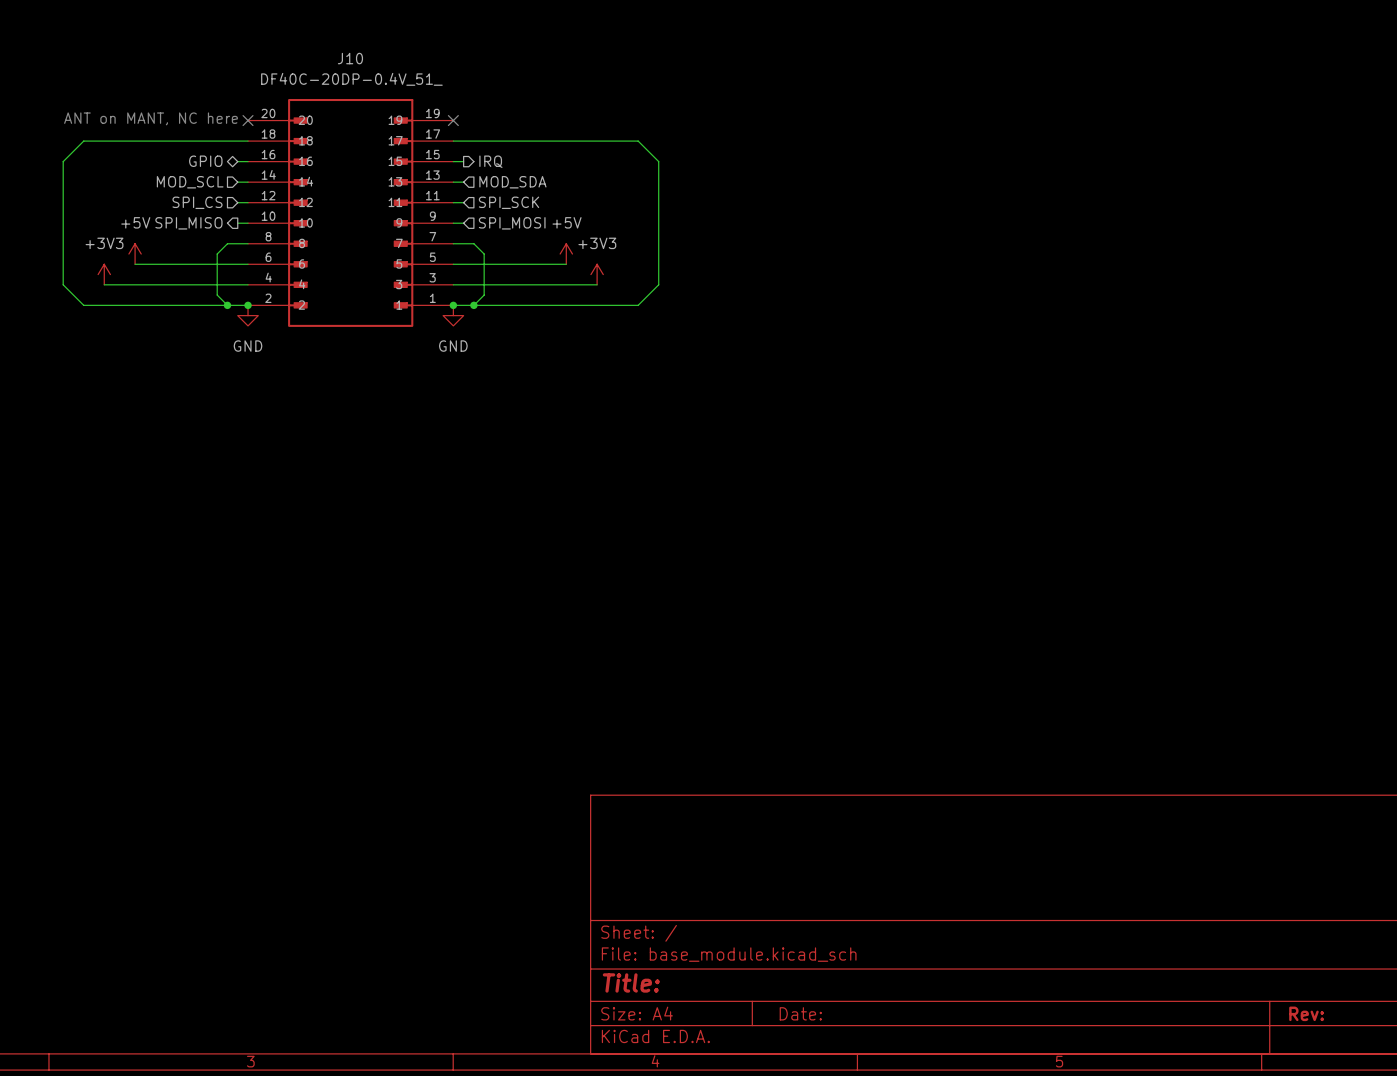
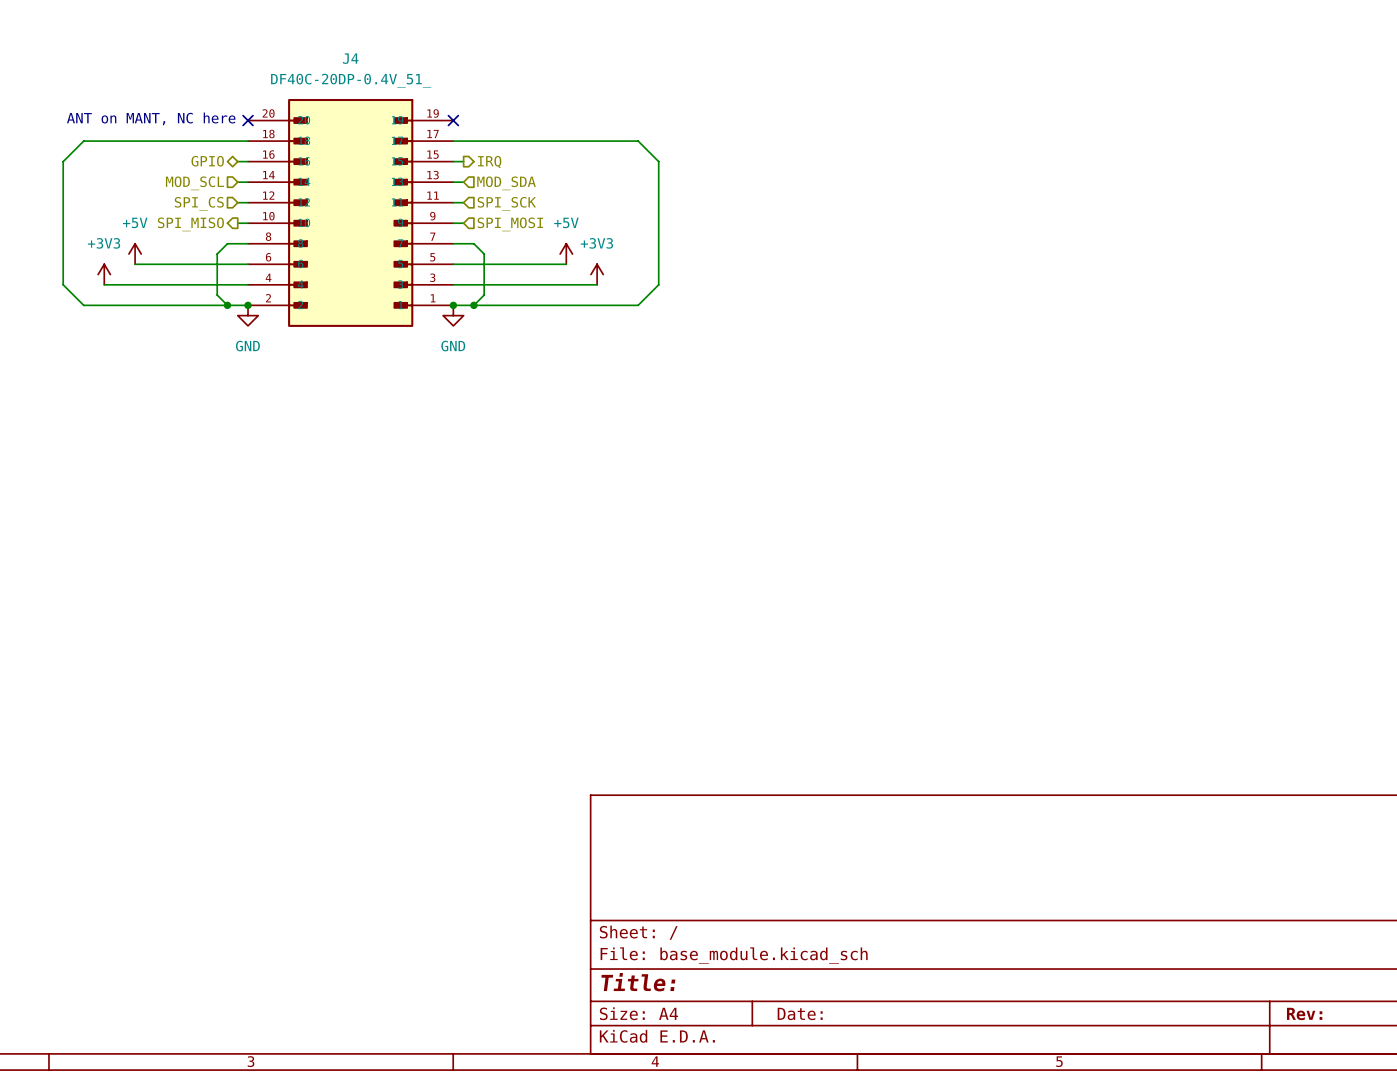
J10 name: J10 (350, 58) -> J4 (350, 58)

